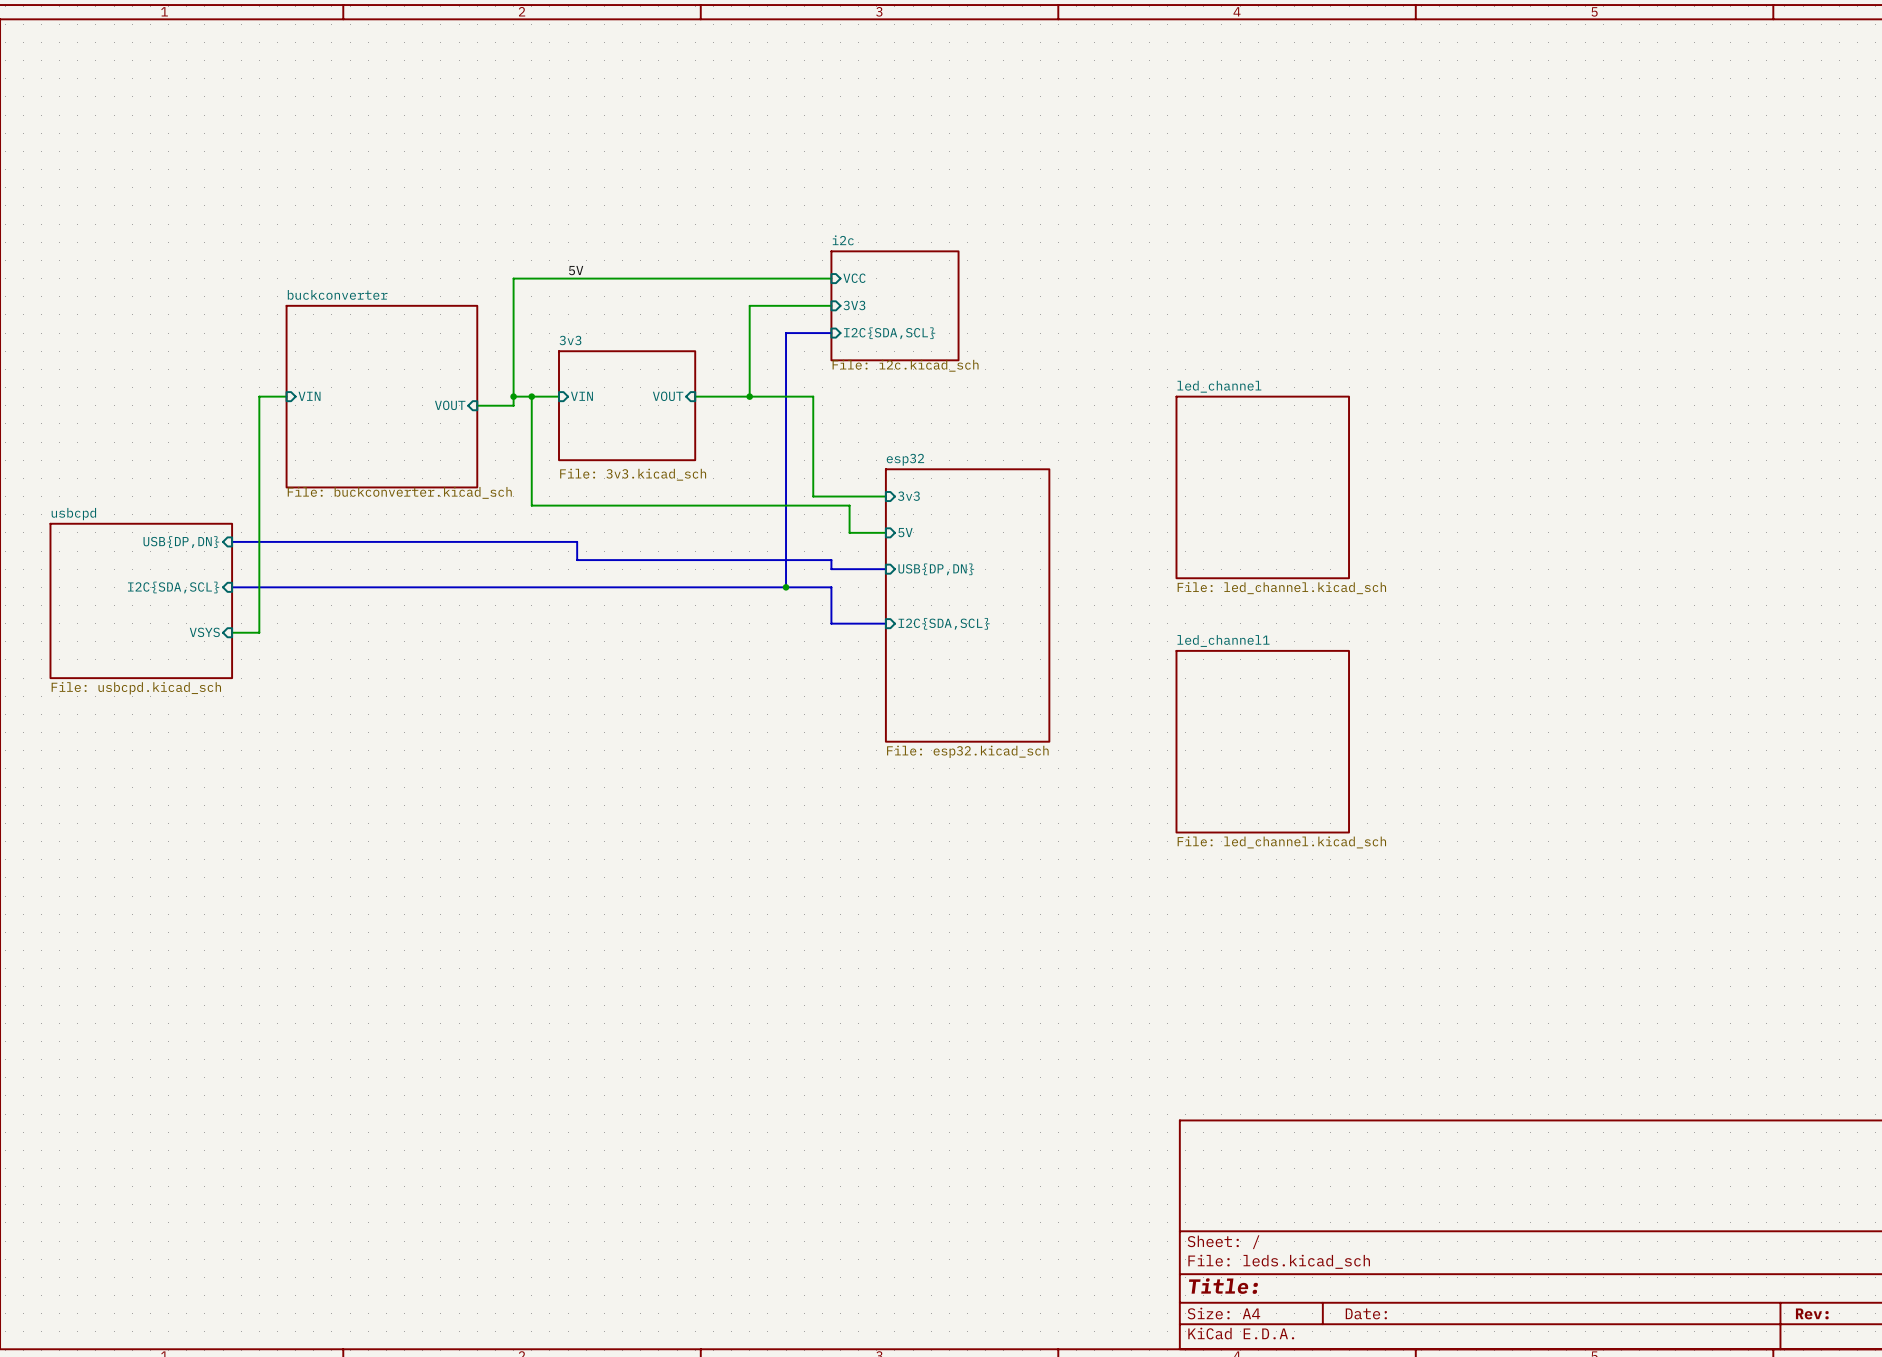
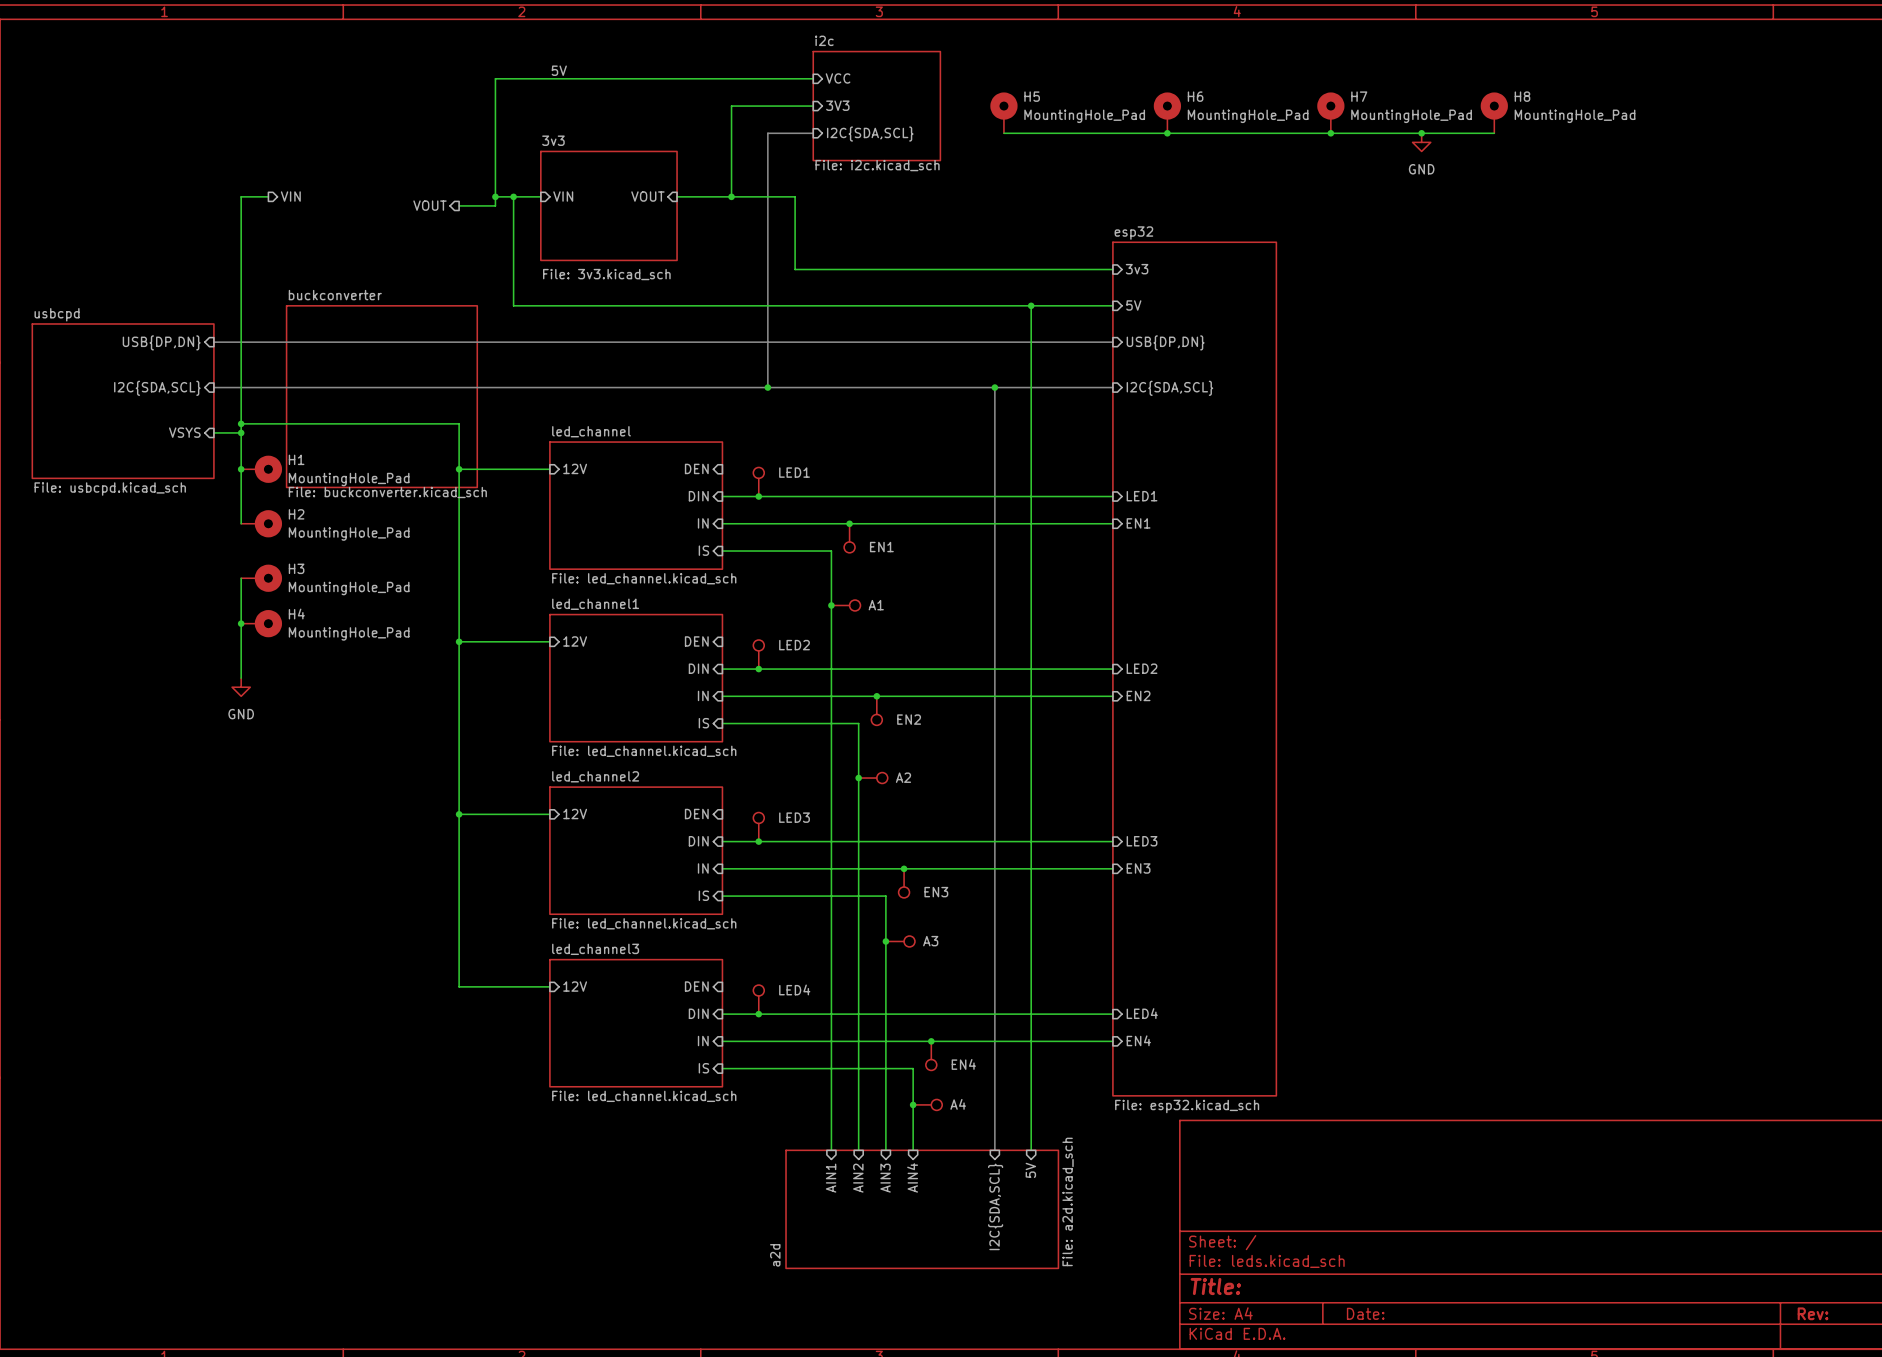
label: none -> 5V (559, 70)
wire: none -> (813, 78) (495, 78) (495, 205) (459, 205)
sheet pin: none -> VCC (838, 78)
sheet pin: none -> 3V3 (837, 105)
wire: none -> (813, 106) (731, 106) (731, 196)
H5: none -> MountingHole_Pad (1003, 112)
H6: none -> MountingHole_Pad (1167, 112)
H7: none -> MountingHole_Pad (1330, 112)
H8: none -> MountingHole_Pad (1494, 112)
bus: none -> (813, 133) (767, 133) (767, 387)
sheet pin: none -> I2C{SDA,SCL} (870, 134)
wire: none -> (1003, 133) (1494, 133)
junction: none -> (1167, 133)
junction: none -> (1330, 133)
junction: none -> (1421, 133)
power symbol: none -> GND (1421, 142)
wire: none -> (268, 196) (241, 196) (241, 523)
sheet pin: none -> VIN (290, 196)
wire: none -> (495, 196) (540, 196)
junction: none -> (495, 196)
junction: none -> (513, 196)
sheet pin: none -> VIN (563, 196)
sheet pin: none -> VOUT (647, 196)
wire: none -> (677, 196) (795, 196) (795, 269) (1112, 269)
junction: none -> (731, 196)
sheet pin: none -> VOUT (429, 205)
sheet pin: none -> 3v3 (1137, 269)
label: 5V (576, 270) -> none
wire: (513, 278) (831, 278) -> (513, 278) (513, 196)
sheet pin: VCC (854, 278) -> none
wire: (513, 305) (513, 405) (477, 405) -> none
wire: (749, 305) (749, 396) -> (749, 305) (513, 305)
wire: none -> (831, 305) (1112, 305)
sheet pin: 3V3 (854, 305) -> none
sheet i2c position: (894, 305) -> (876, 106)
wire: none -> (1031, 305) (1031, 1150)
junction: none -> (1031, 305)
sheet pin: none -> 5V (1133, 305)
bus: (831, 333) (786, 333) (786, 587) -> none
sheet pin: I2C{SDA,SCL} (889, 333) -> none
sheet pin: none -> USB{DP,DN} (161, 342)
bus: none -> (213, 342) (1112, 342)
sheet pin: none -> USB{DP,DN} (1165, 342)
sheet pin: none -> I2C{SDA,SCL} (157, 388)
bus: none -> (213, 387) (1112, 387)
bus: none -> (994, 387) (994, 1150)
junction: none -> (994, 387)
sheet pin: none -> I2C{SDA,SCL} (1169, 388)
wire: (286, 396) (259, 396) (259, 632) (232, 632) -> none
sheet pin: VIN (309, 396) -> none
wire: (513, 396) (558, 396) -> none
junction: (513, 396) -> none
wire: (531, 396) (531, 505) (849, 505) (849, 532) (885, 532) -> none
junction: (531, 396) -> none
sheet pin: VIN (581, 396) -> none
sheet pin: VOUT (668, 396) -> none
wire: (695, 396) (813, 396) (813, 496) -> (722, 496) (813, 496)
junction position: (749, 396) -> (767, 387)
sheet usbcpd: none -> File: usbcpd.kicad_sch (123, 401)
sheet pin: VOUT (450, 405) -> none
sheet 3v3 position: (627, 405) -> (608, 205)
wire: none -> (241, 423) (459, 423) (459, 986) (549, 986)
junction: none -> (241, 423)
sheet pin: none -> VSYS (184, 432)
wire: none -> (213, 432) (241, 432)
junction: none -> (241, 432)
sheet esp32 name position: esp32 (905, 459) -> esp32 (1133, 233)
sheet pin: none -> 12V (575, 468)
sheet pin: none -> DEN (696, 468)
sheet esp32 shape: [885, 468, 1050, 743] -> [1112, 241, 1277, 1097]
junction: none -> (241, 469)
H1: none -> MountingHole_Pad (261, 469)
wire: none -> (459, 469) (549, 469)
junction: none -> (459, 469)
part: none -> (758, 481)
sheet led_channel: File: led_channel.kicad_sch (1262, 487) -> none
sheet pin: none -> DIN (698, 496)
junction: none -> (758, 496)
wire: none -> (885, 496) (1112, 496)
sheet pin: 3v3 (908, 496) -> none
sheet pin: none -> LED1 (1142, 496)
sheet led_channel: none -> File: led_channel.kicad_sch (636, 505)
H2: none -> MountingHole_Pad (261, 523)
sheet pin: none -> IN (703, 523)
wire: none -> (722, 523) (1112, 523)
junction: none -> (849, 523)
sheet pin: none -> EN1 (1138, 523)
sheet pin: 5V (905, 532) -> none
part: none -> (849, 538)
bus: (232, 541) (577, 541) (577, 560) (831, 560) (831, 569) (885, 569) -> none
sheet pin: USB{DP,DN} (181, 542) -> none
sheet pin: none -> IS (703, 550)
wire: none -> (722, 551) (831, 551) (831, 1150)
sheet pin: USB{DP,DN} (936, 569) -> none
wire: none -> (241, 578) (241, 678)
H3: none -> MountingHole_Pad (261, 578)
sheet pin: I2C{SDA,SCL} (173, 587) -> none
bus: (232, 587) (831, 587) (831, 623) (885, 623) -> none
junction: (786, 587) -> none
sheet usbcpd: File: usbcpd.kicad_sch (141, 600) -> none
junction: none -> (831, 605)
part: none -> (845, 605)
junction: none -> (241, 623)
H4: none -> MountingHole_Pad (261, 623)
sheet pin: I2C{SDA,SCL} (944, 623) -> none
sheet pin: VSYS (204, 632) -> none
sheet led_channel1 name position: led_channel1 (1223, 640) -> led_channel1 (595, 604)
wire: none -> (459, 641) (549, 641)
junction: none -> (459, 641)
sheet pin: none -> 12V (575, 641)
sheet pin: none -> DEN (696, 641)
sheet led_channel1 shape: [1175, 650, 1350, 834] -> [549, 614, 723, 743]
part: none -> (758, 654)
sheet pin: none -> DIN (698, 668)
sheet pin: none -> LED2 (1142, 668)
wire: none -> (722, 669) (1112, 669)
junction: none -> (758, 669)
power symbol: none -> GND (241, 687)
sheet pin: none -> IN (703, 695)
sheet pin: none -> EN2 (1138, 695)
wire: none -> (722, 696) (1112, 696)
junction: none -> (876, 696)
part: none -> (876, 710)
sheet pin: none -> IS (703, 723)
wire: none -> (722, 723) (858, 723) (858, 1150)
sheet esp32 value position: File: esp32.kicad_sch (967, 751) -> File: esp32.kicad_sch (1187, 1106)
junction: none -> (858, 778)
part: none -> (873, 778)
sheet pin: none -> 12V (575, 814)
wire: none -> (459, 814) (549, 814)
junction: none -> (459, 814)
sheet pin: none -> DEN (696, 814)
part: none -> (758, 827)
sheet pin: none -> DIN (698, 841)
wire: none -> (722, 841) (1112, 841)
junction: none -> (758, 841)
sheet pin: none -> LED3 (1142, 841)
sheet led_channel1 value position: File: led_channel.kicad_sch (1281, 842) -> File: led_channel.kicad_sch (644, 751)
sheet led_channel2: none -> File: led_channel.kicad_sch (636, 850)
sheet pin: none -> IN (703, 868)
wire: none -> (722, 868) (1112, 868)
junction: none -> (904, 868)
sheet pin: none -> EN3 (1138, 868)
part: none -> (904, 883)
sheet pin: none -> IS (703, 895)
wire: none -> (722, 896) (885, 896) (885, 1150)
junction: none -> (885, 941)
part: none -> (900, 941)
sheet pin: none -> 12V (575, 986)
sheet pin: none -> DEN (696, 986)
part: none -> (758, 999)
sheet pin: none -> DIN (698, 1013)
sheet pin: none -> LED4 (1142, 1013)
wire: none -> (722, 1014) (1112, 1014)
junction: none -> (758, 1014)
sheet led_channel3: none -> File: led_channel.kicad_sch (636, 1023)
sheet pin: none -> IN (703, 1041)
wire: none -> (722, 1041) (1112, 1041)
junction: none -> (931, 1041)
sheet pin: none -> EN4 (1138, 1040)
part: none -> (931, 1055)
sheet pin: none -> IS (703, 1068)
wire: none -> (722, 1068) (913, 1068) (913, 1150)
junction: none -> (913, 1104)
part: none -> (927, 1104)
sheet pin: none -> 5V (1030, 1170)
sheet pin: none -> AIN1 (831, 1178)
sheet pin: none -> AIN2 (858, 1178)
sheet pin: none -> AIN3 (885, 1178)
sheet pin: none -> AIN4 (912, 1177)
sheet pin: none -> I2C{SDA,SCL} (995, 1206)
sheet a2d: none -> File: a2d.kicad_sch (922, 1209)

